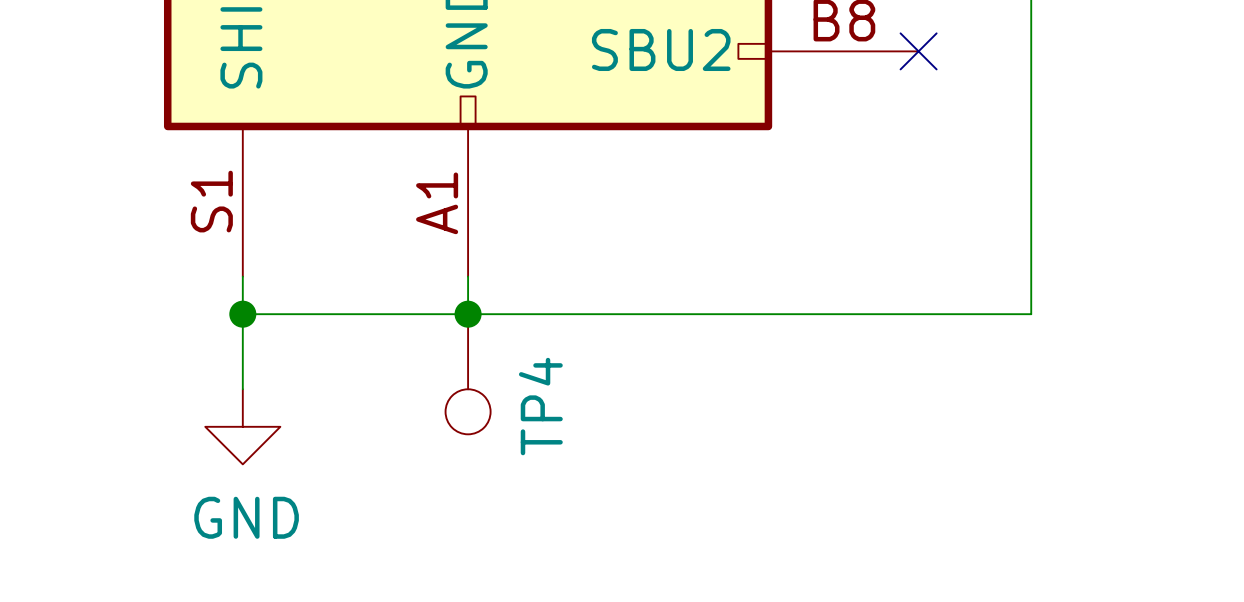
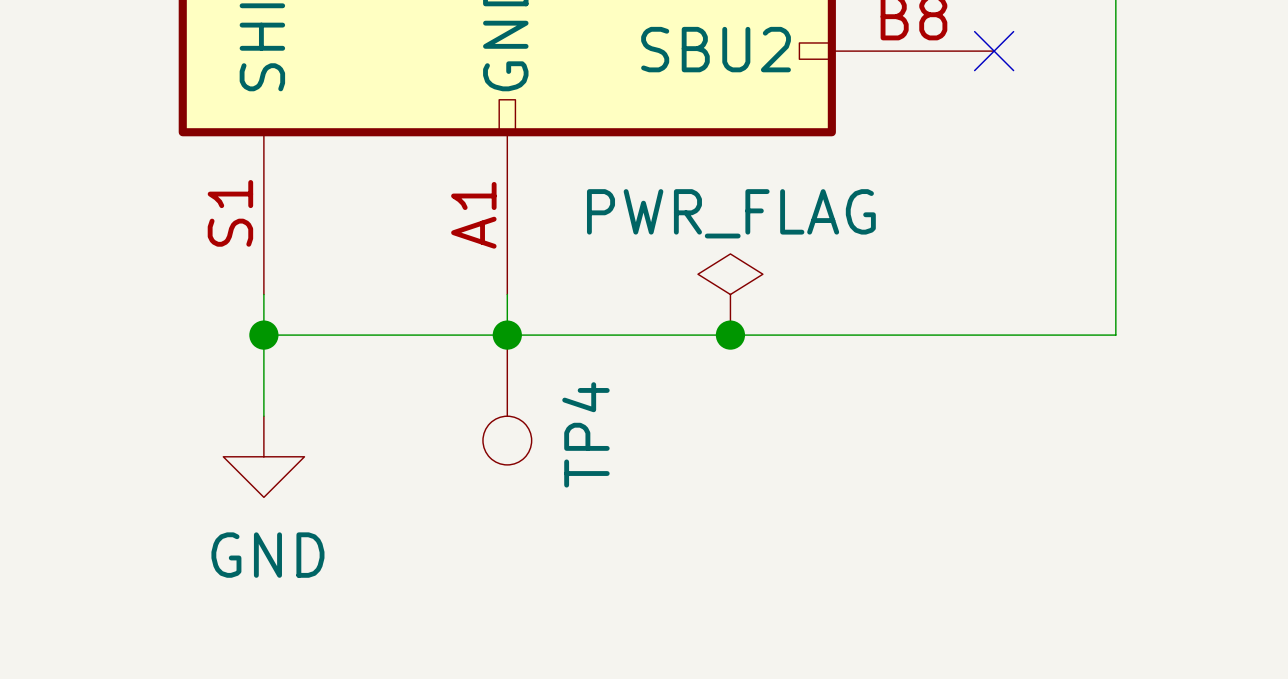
power symbol: none -> PWR_FLAG (730, 294)
junction: none -> (730, 335)

